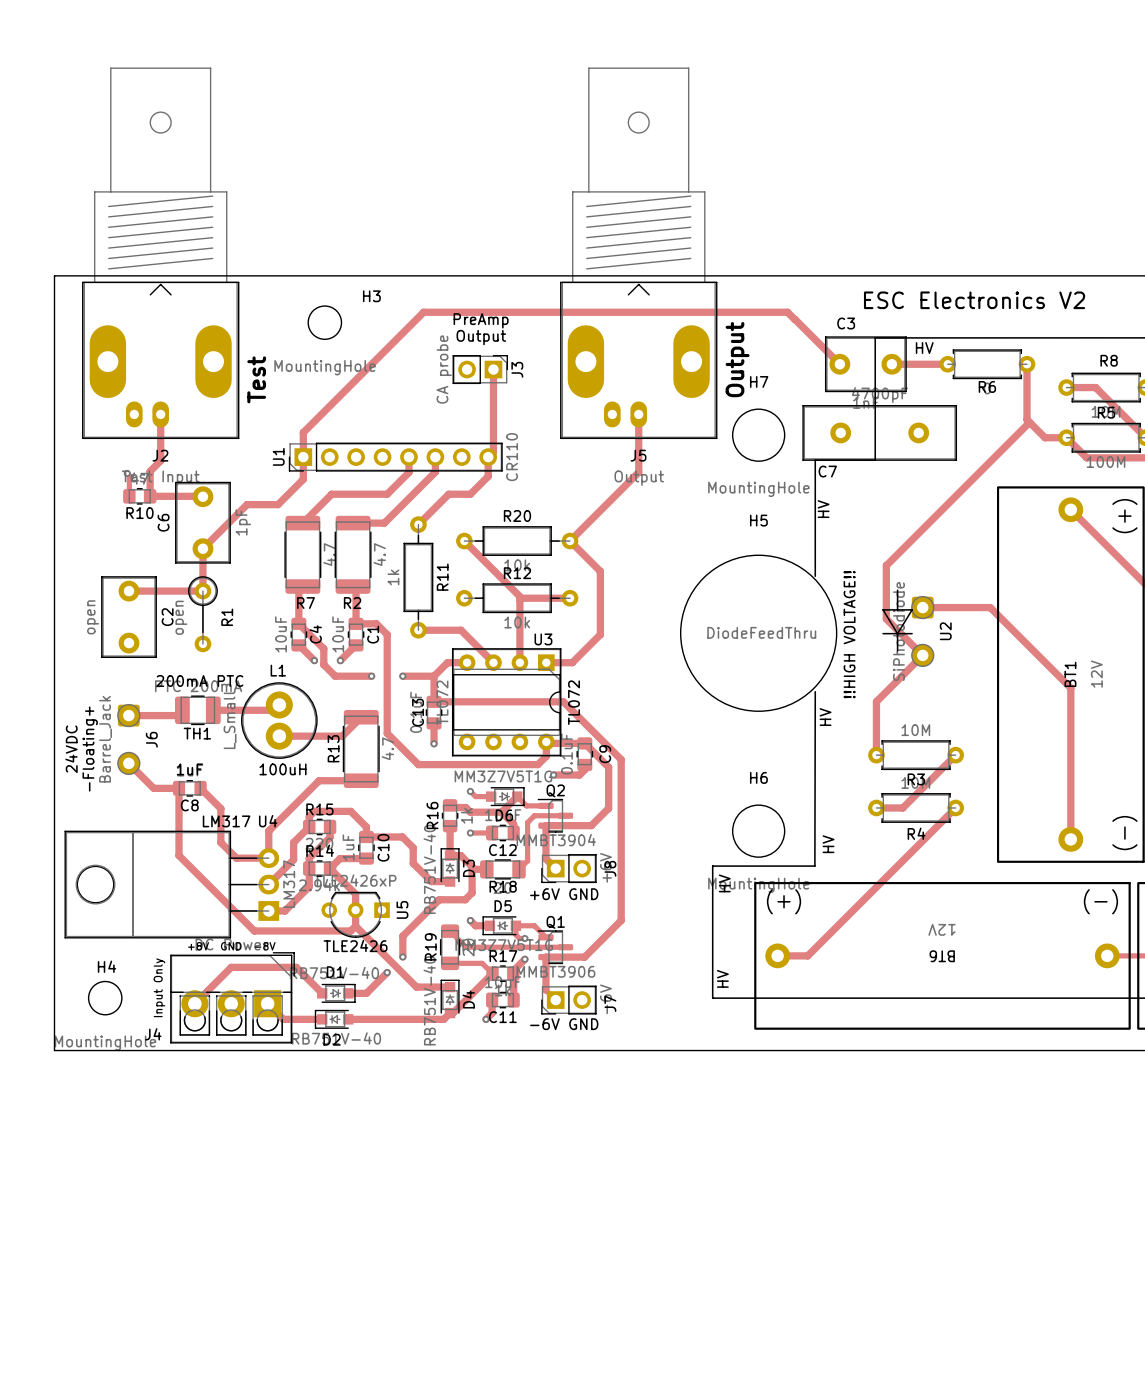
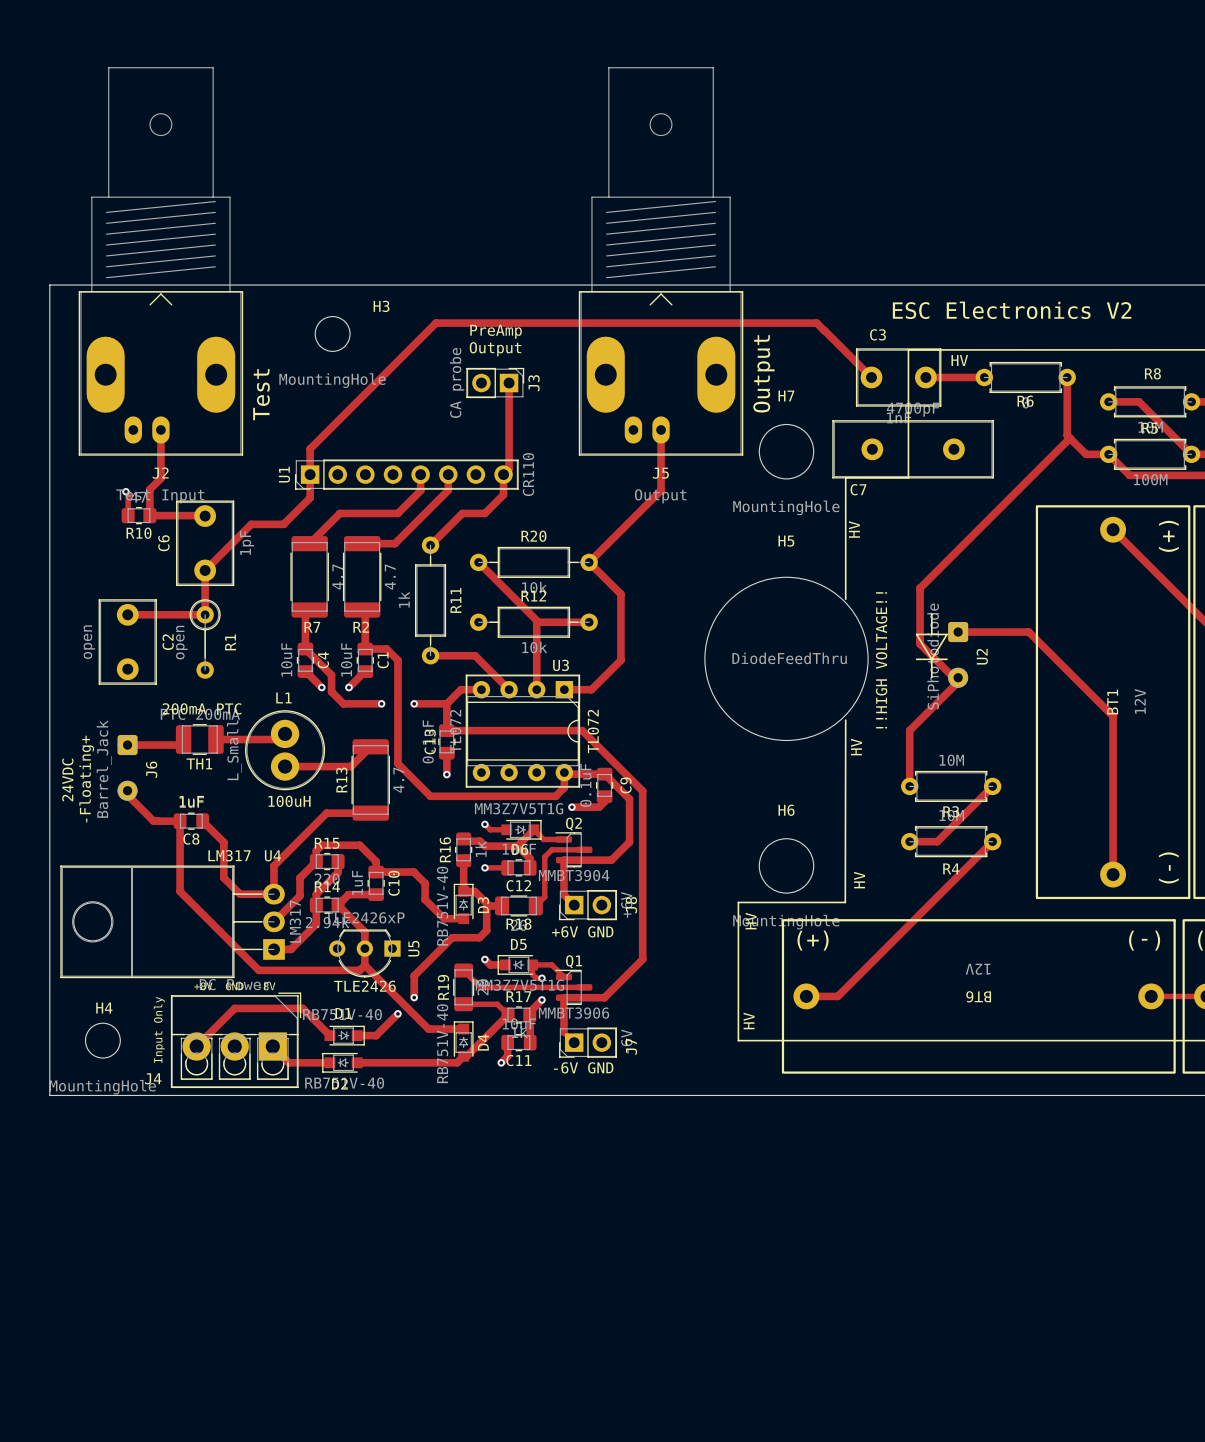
U2 footprint: [911, 596, 935, 667] -> [948, 621, 969, 688]
J6 footprint: [117, 704, 141, 775] -> [117, 734, 138, 801]

